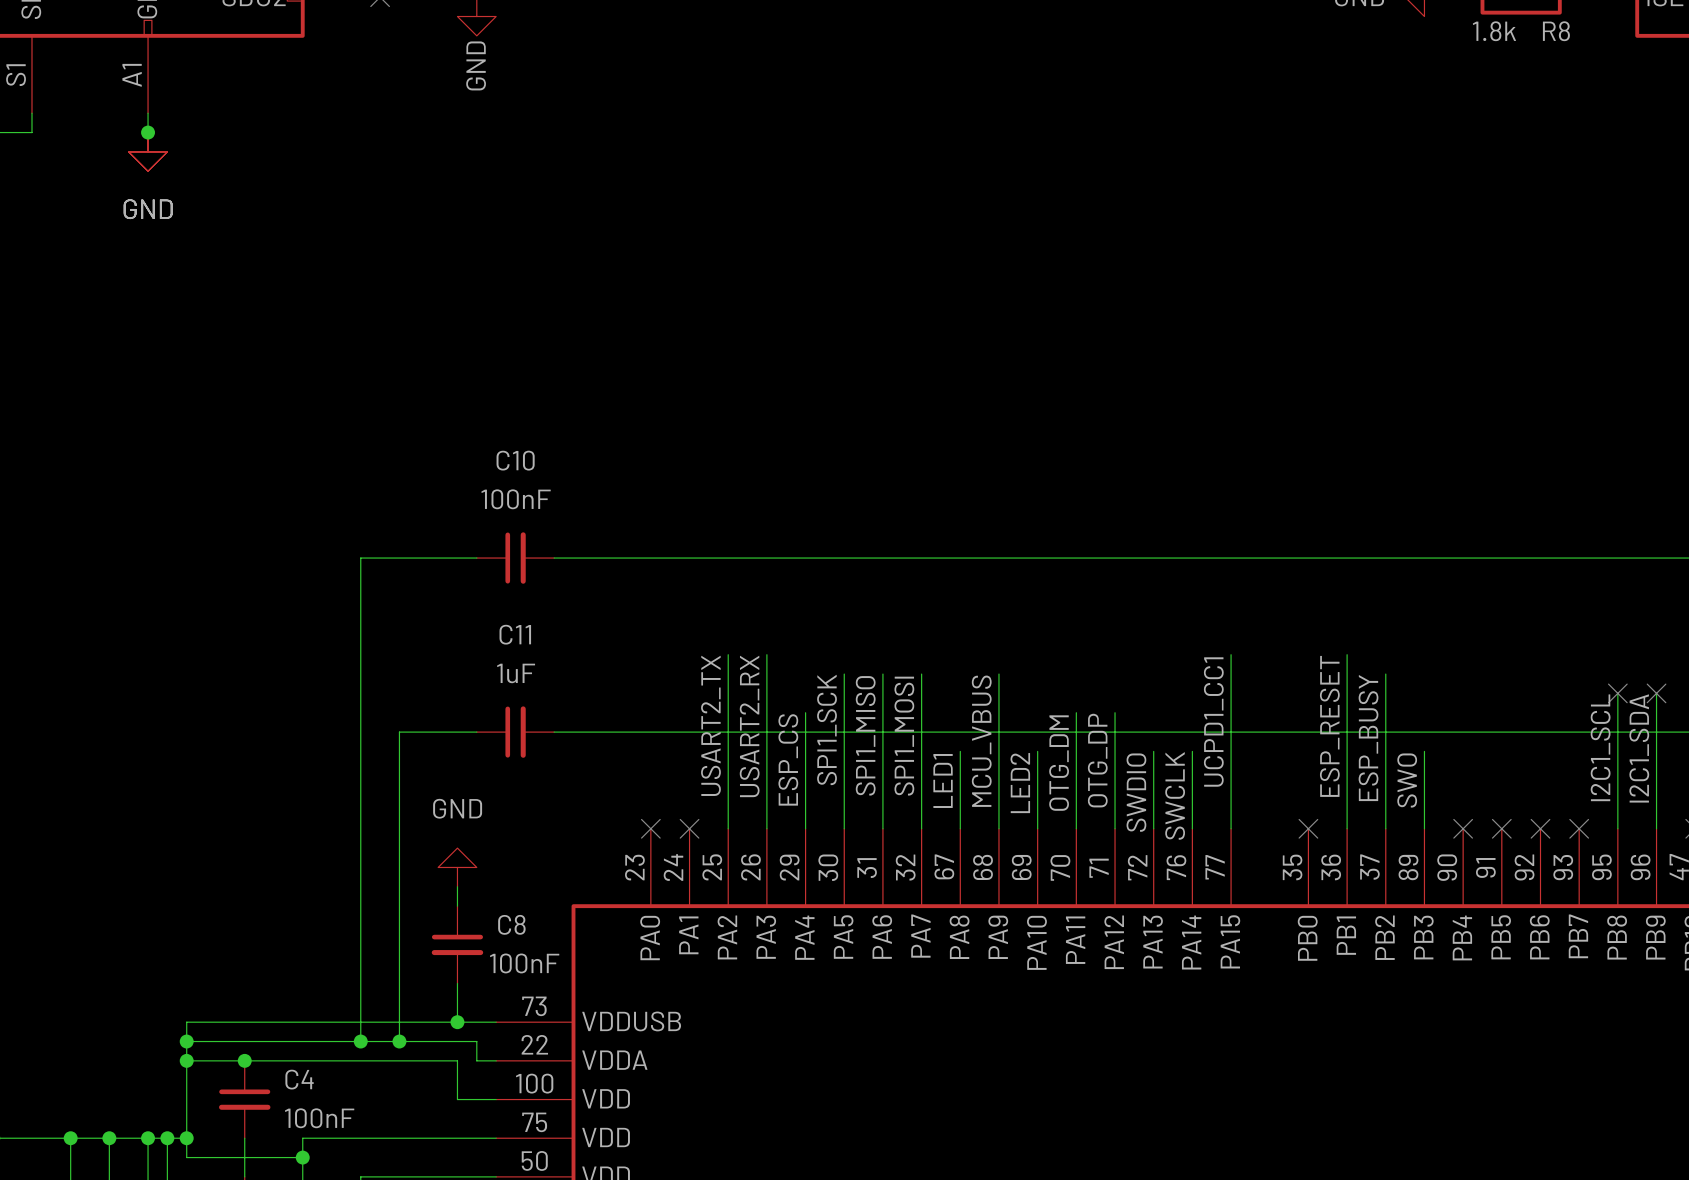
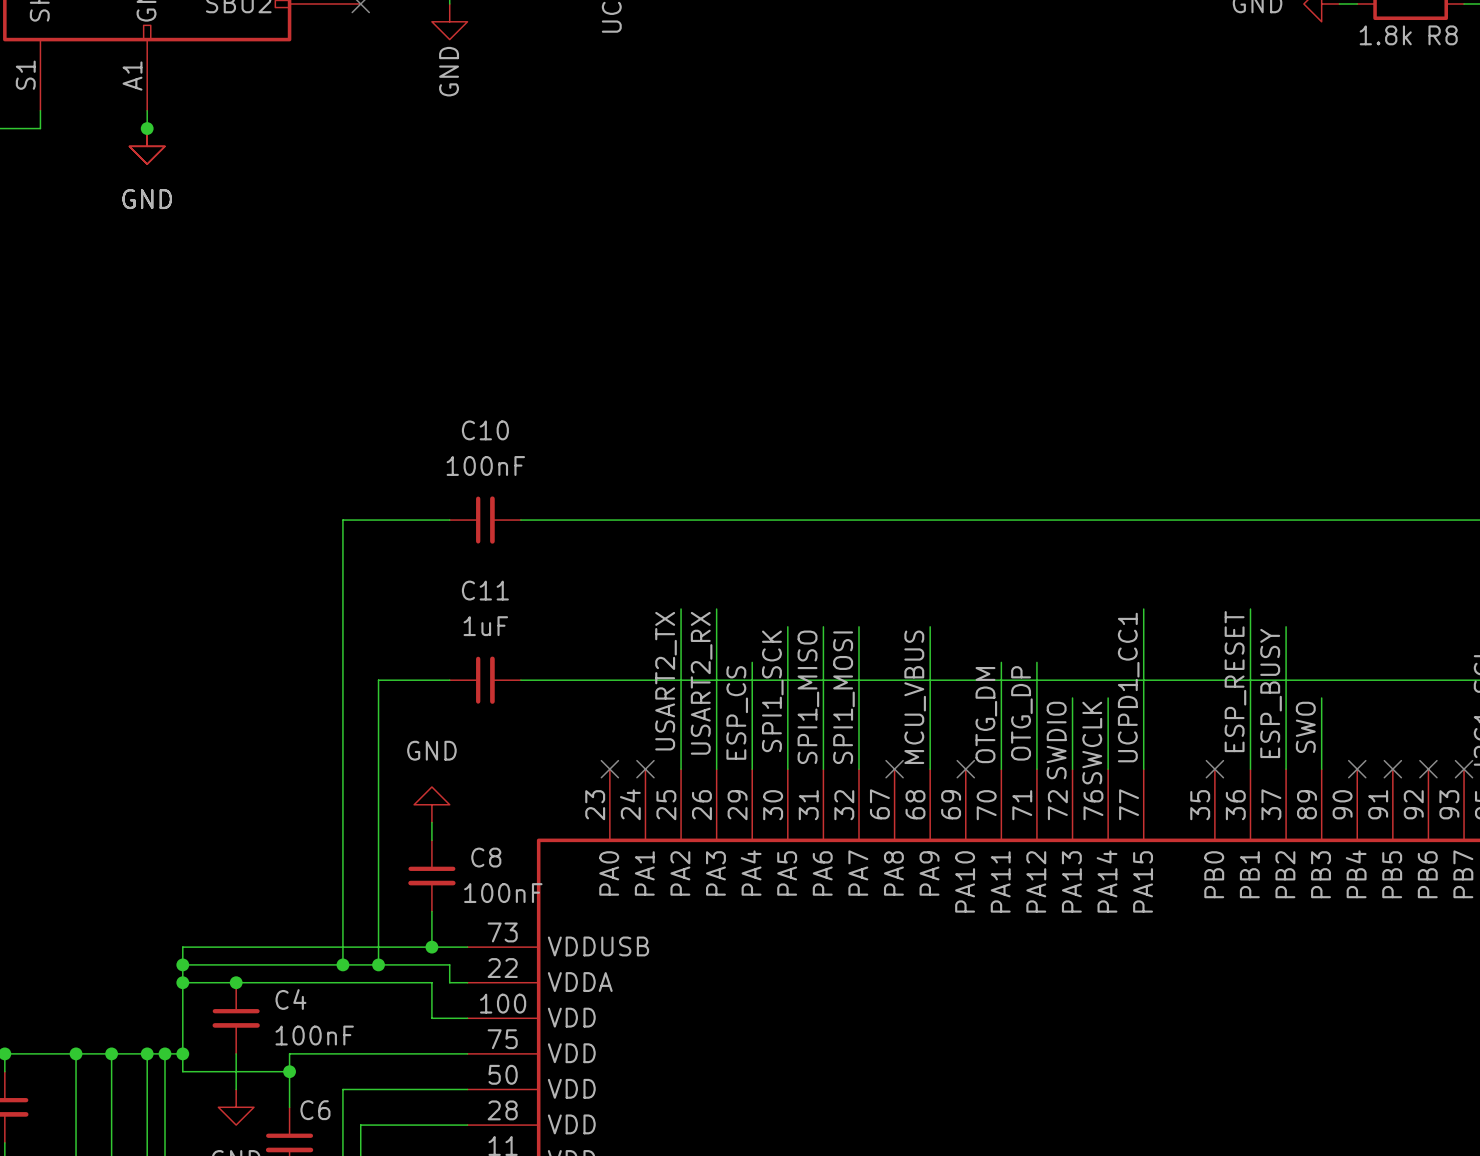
wire: (960, 751) (960, 828) -> none
wire: (1037, 751) (1037, 828) -> none
label: LED1 (943, 780) -> none
label: LED2 (1020, 783) -> none
no-connect mark: none -> (894, 769)
no-connect mark: none -> (965, 769)

